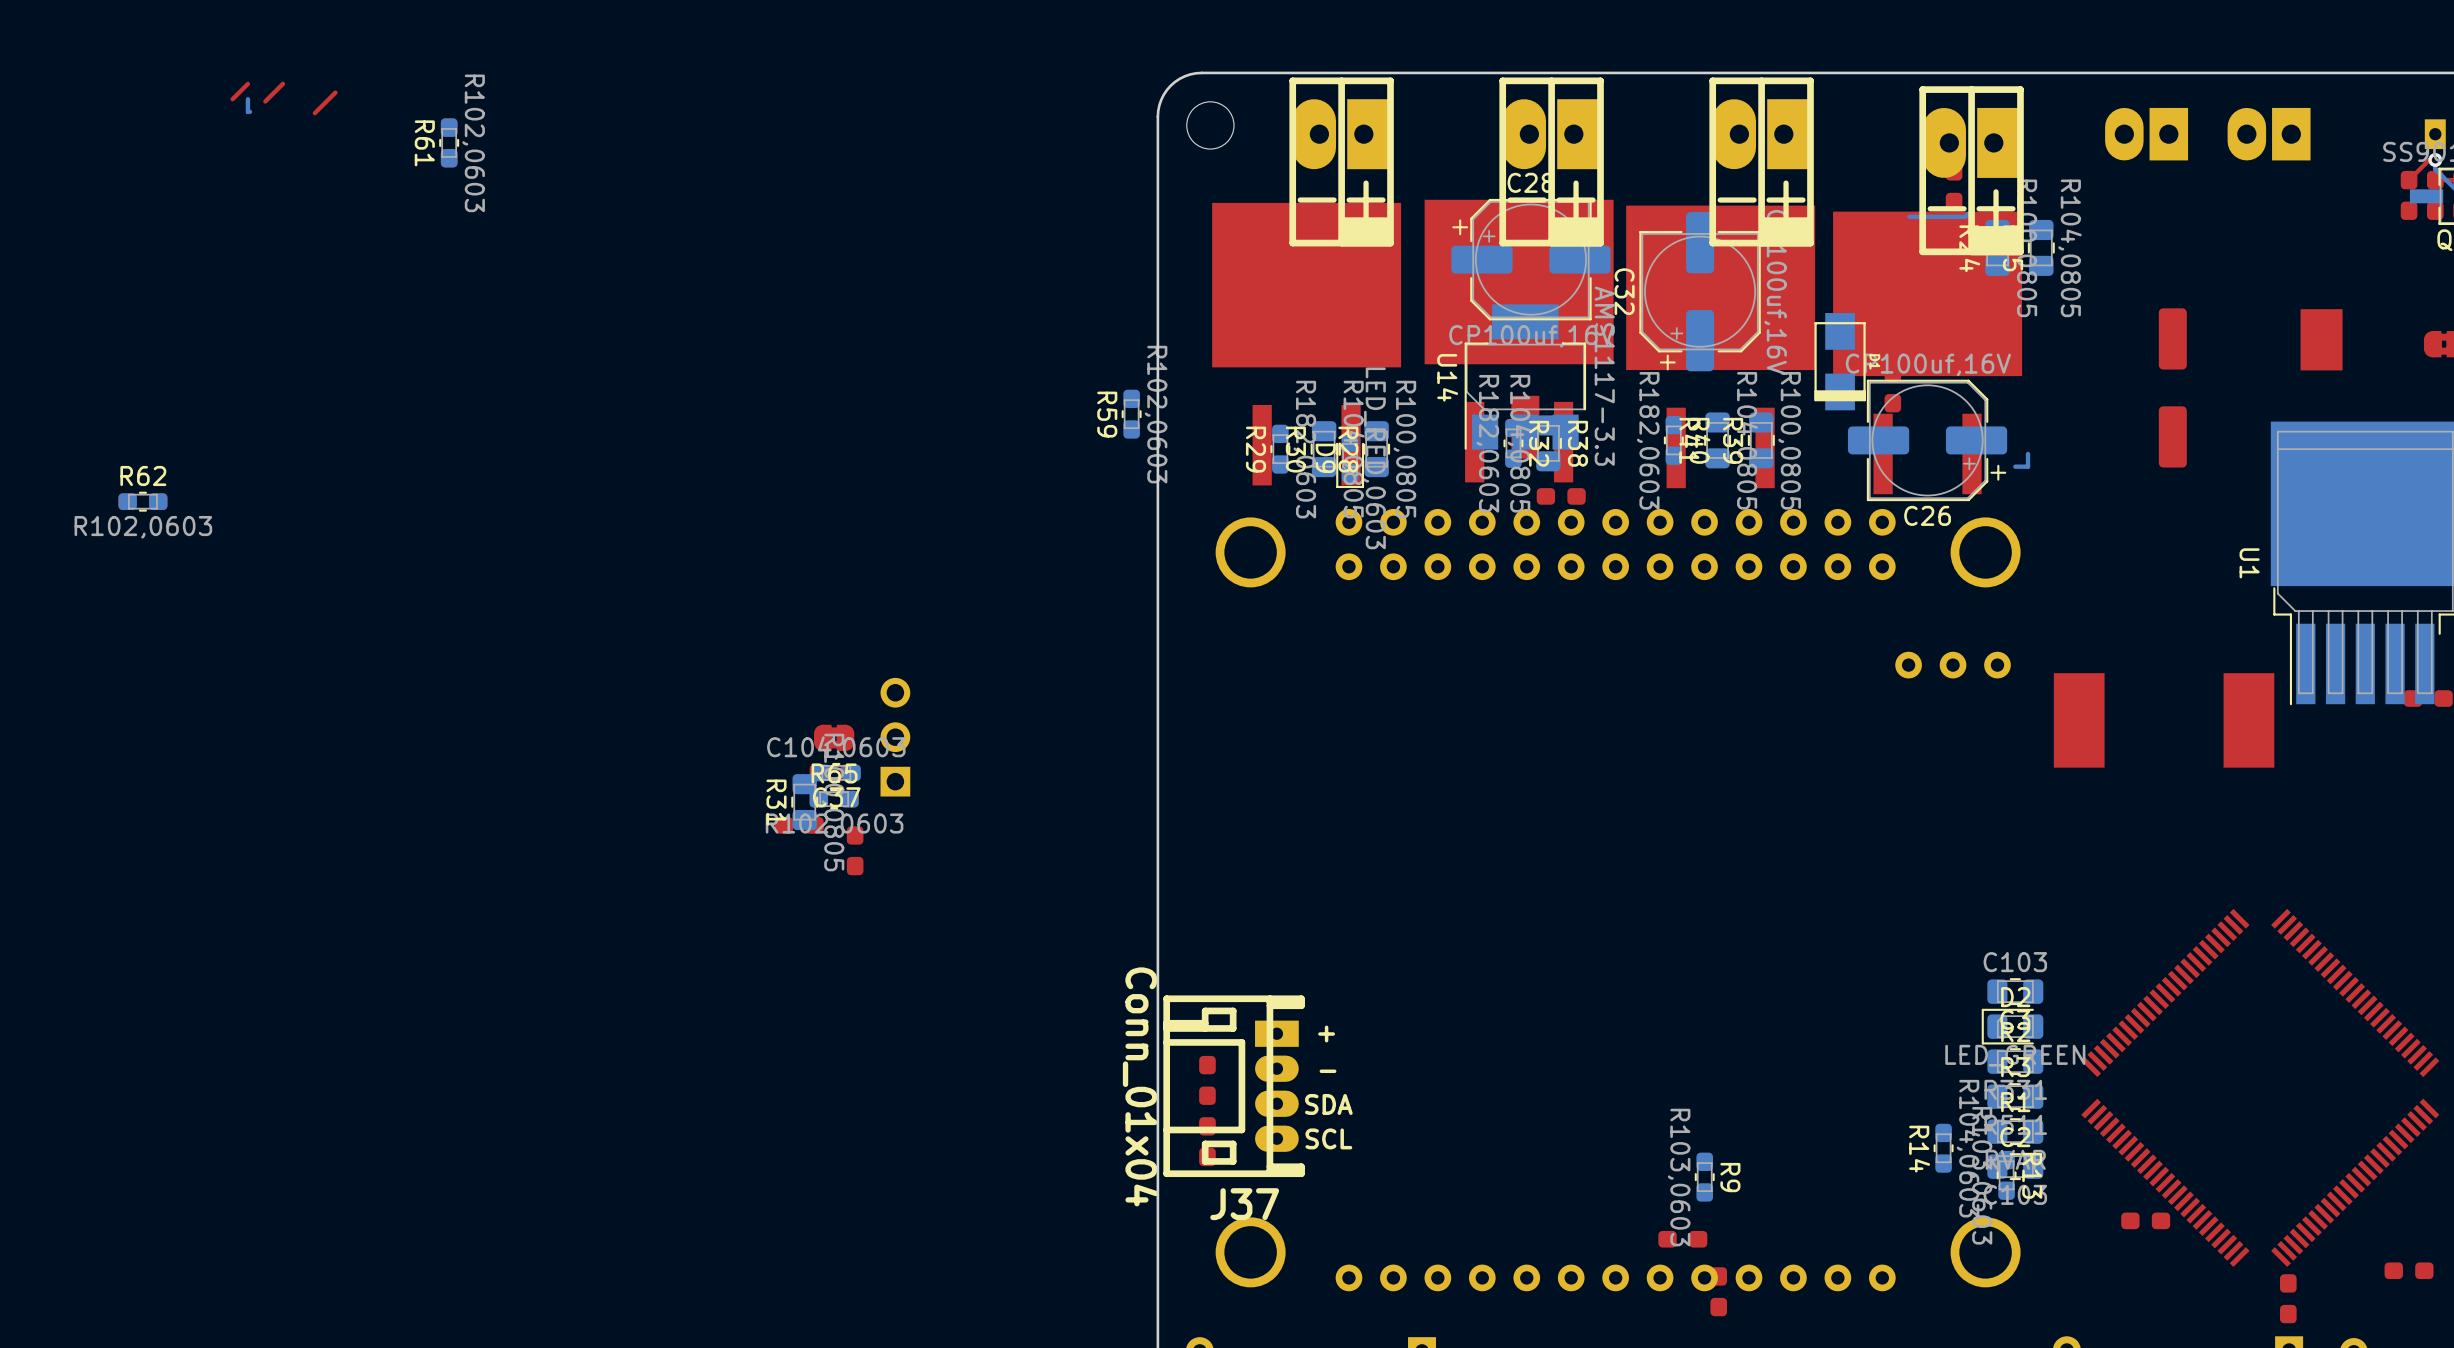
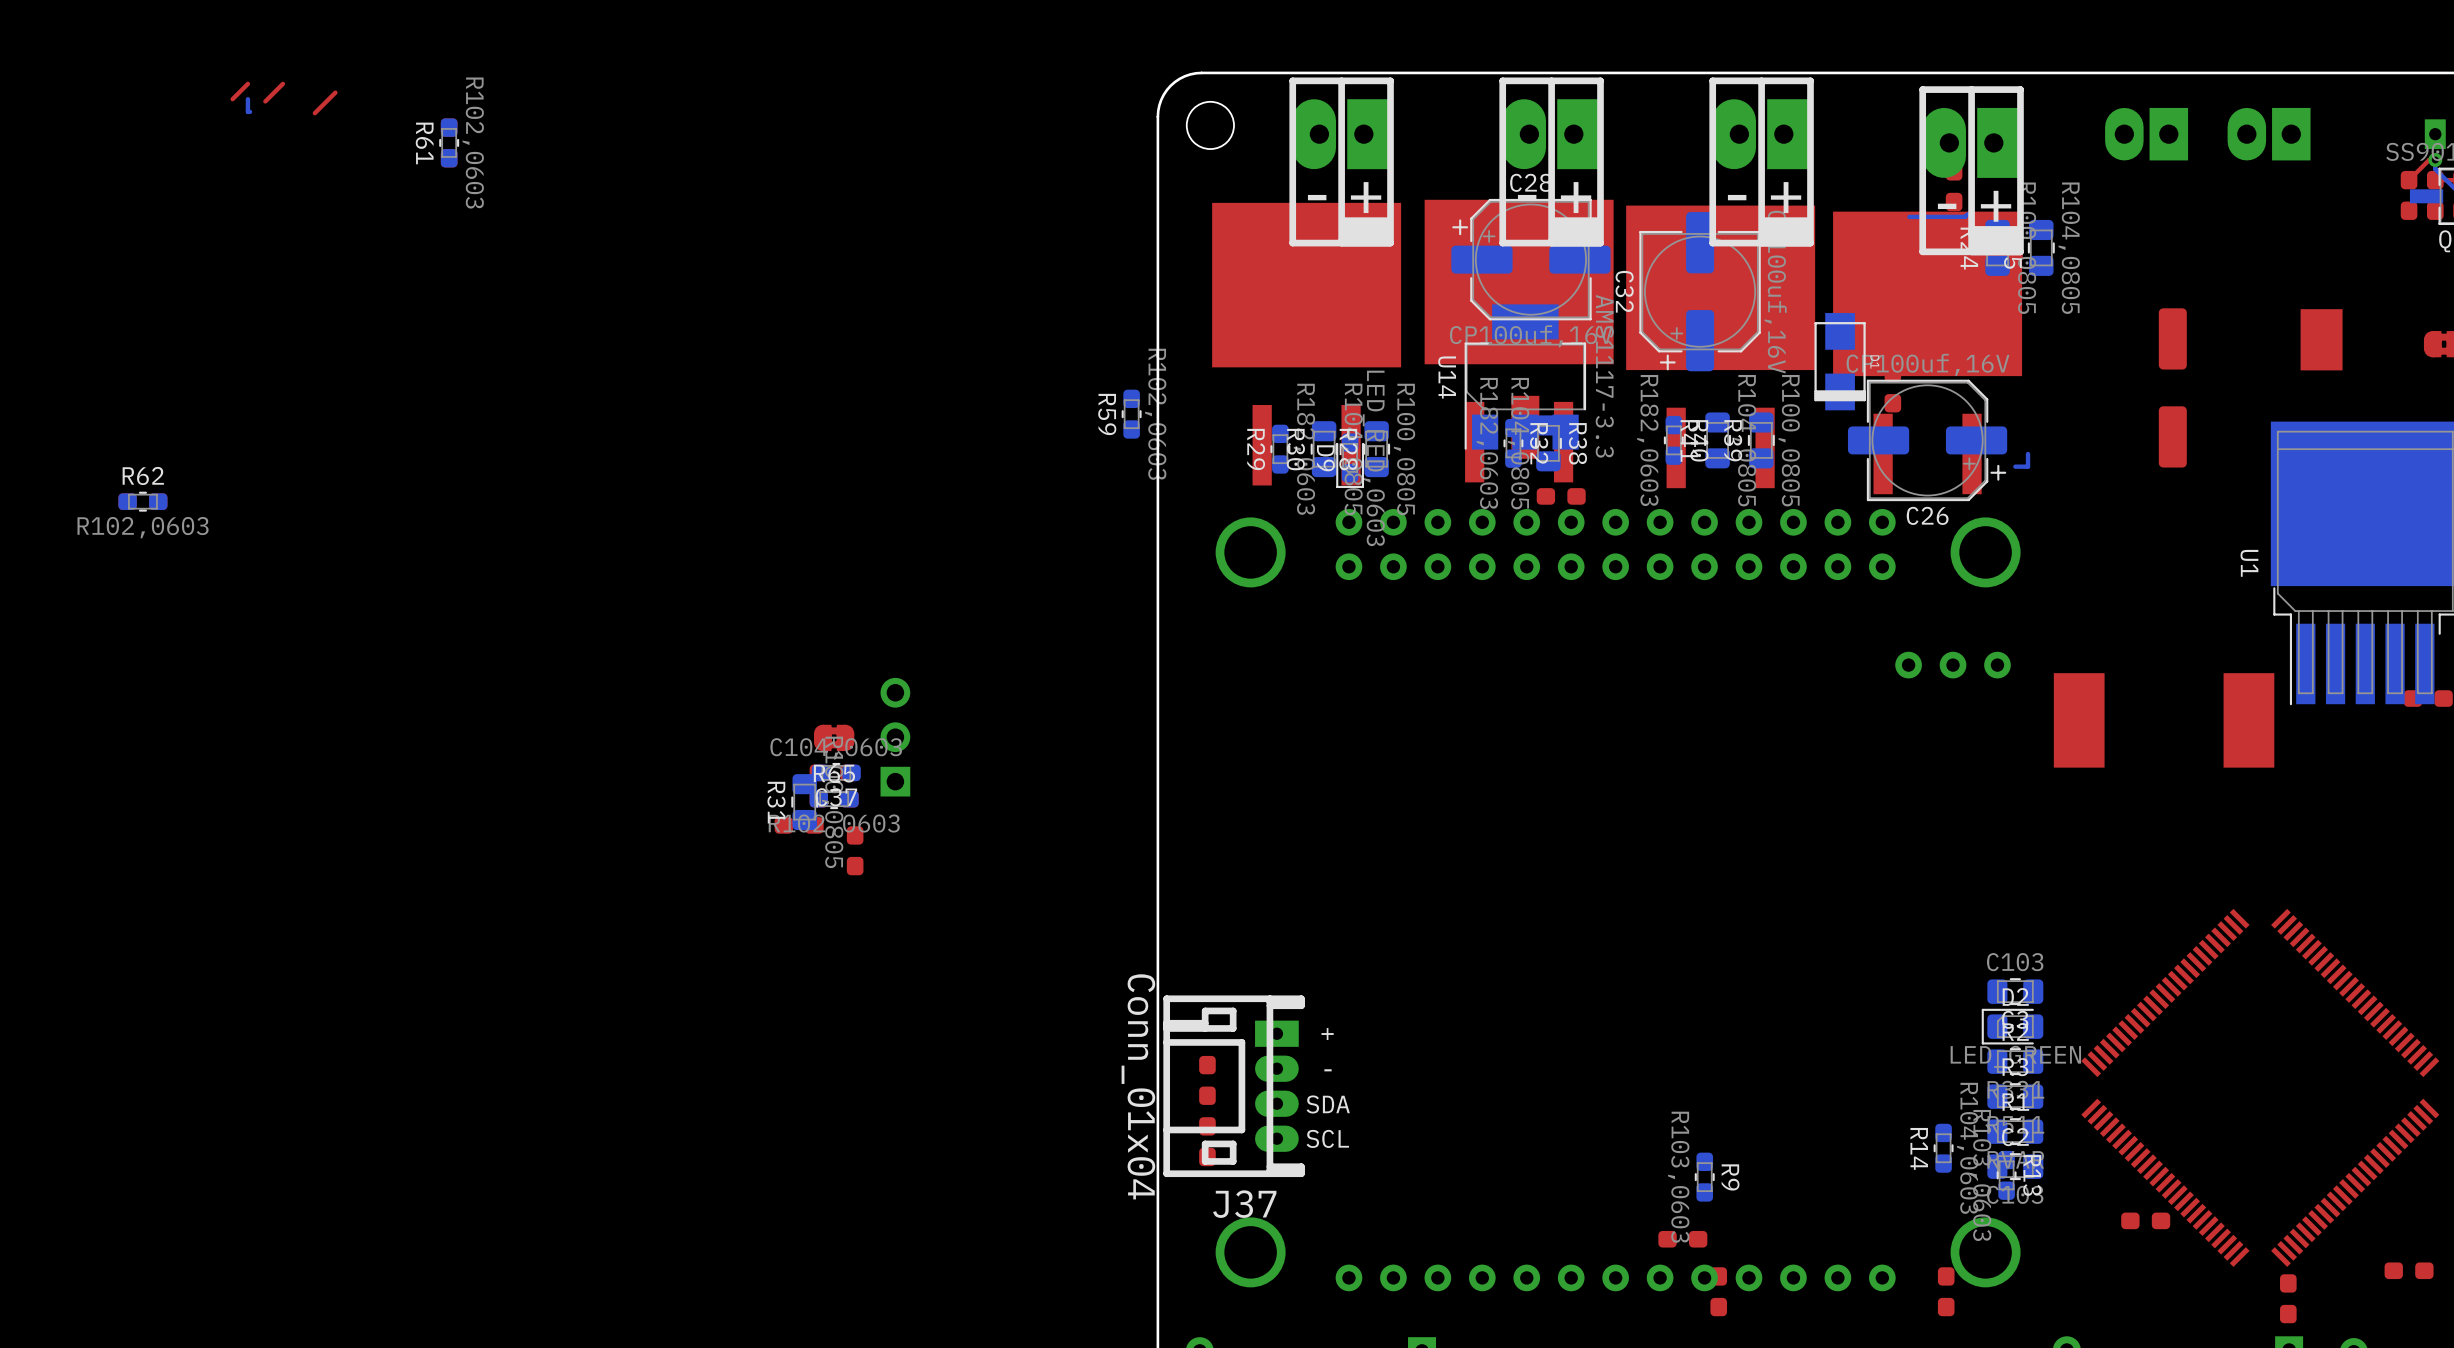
part: none -> (1946, 1291)

